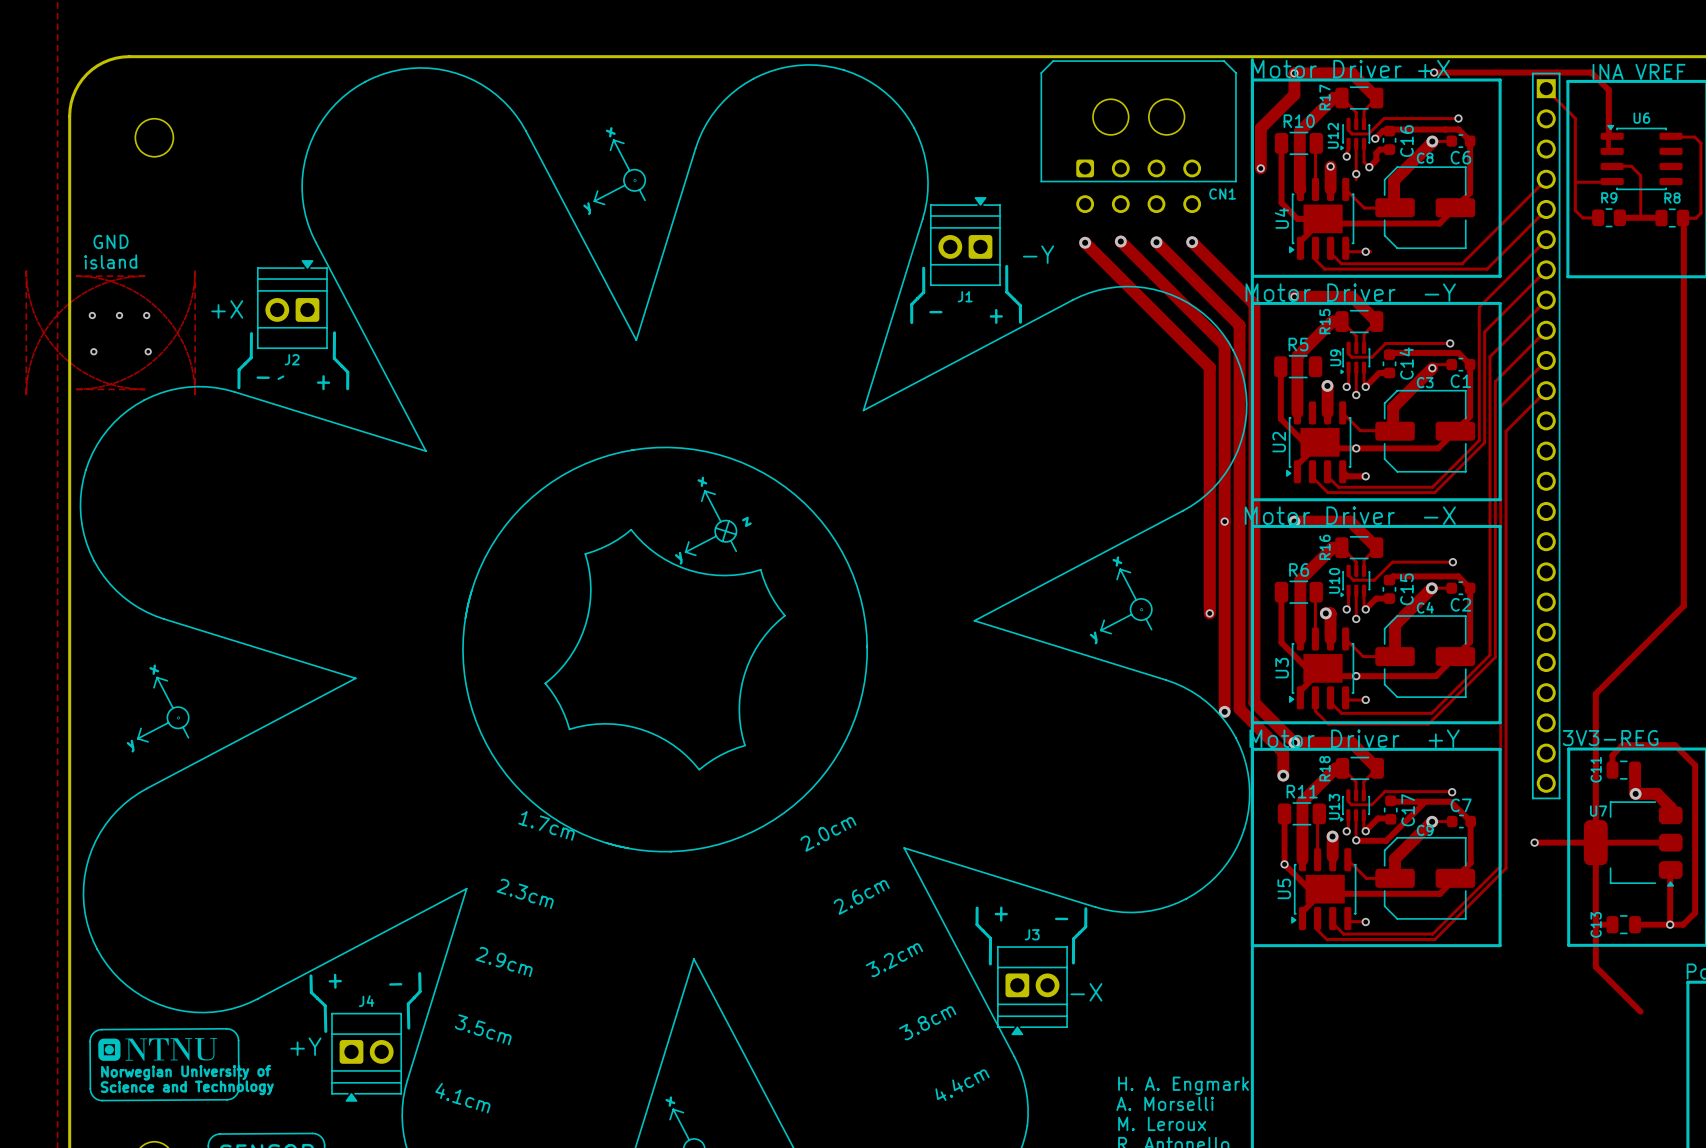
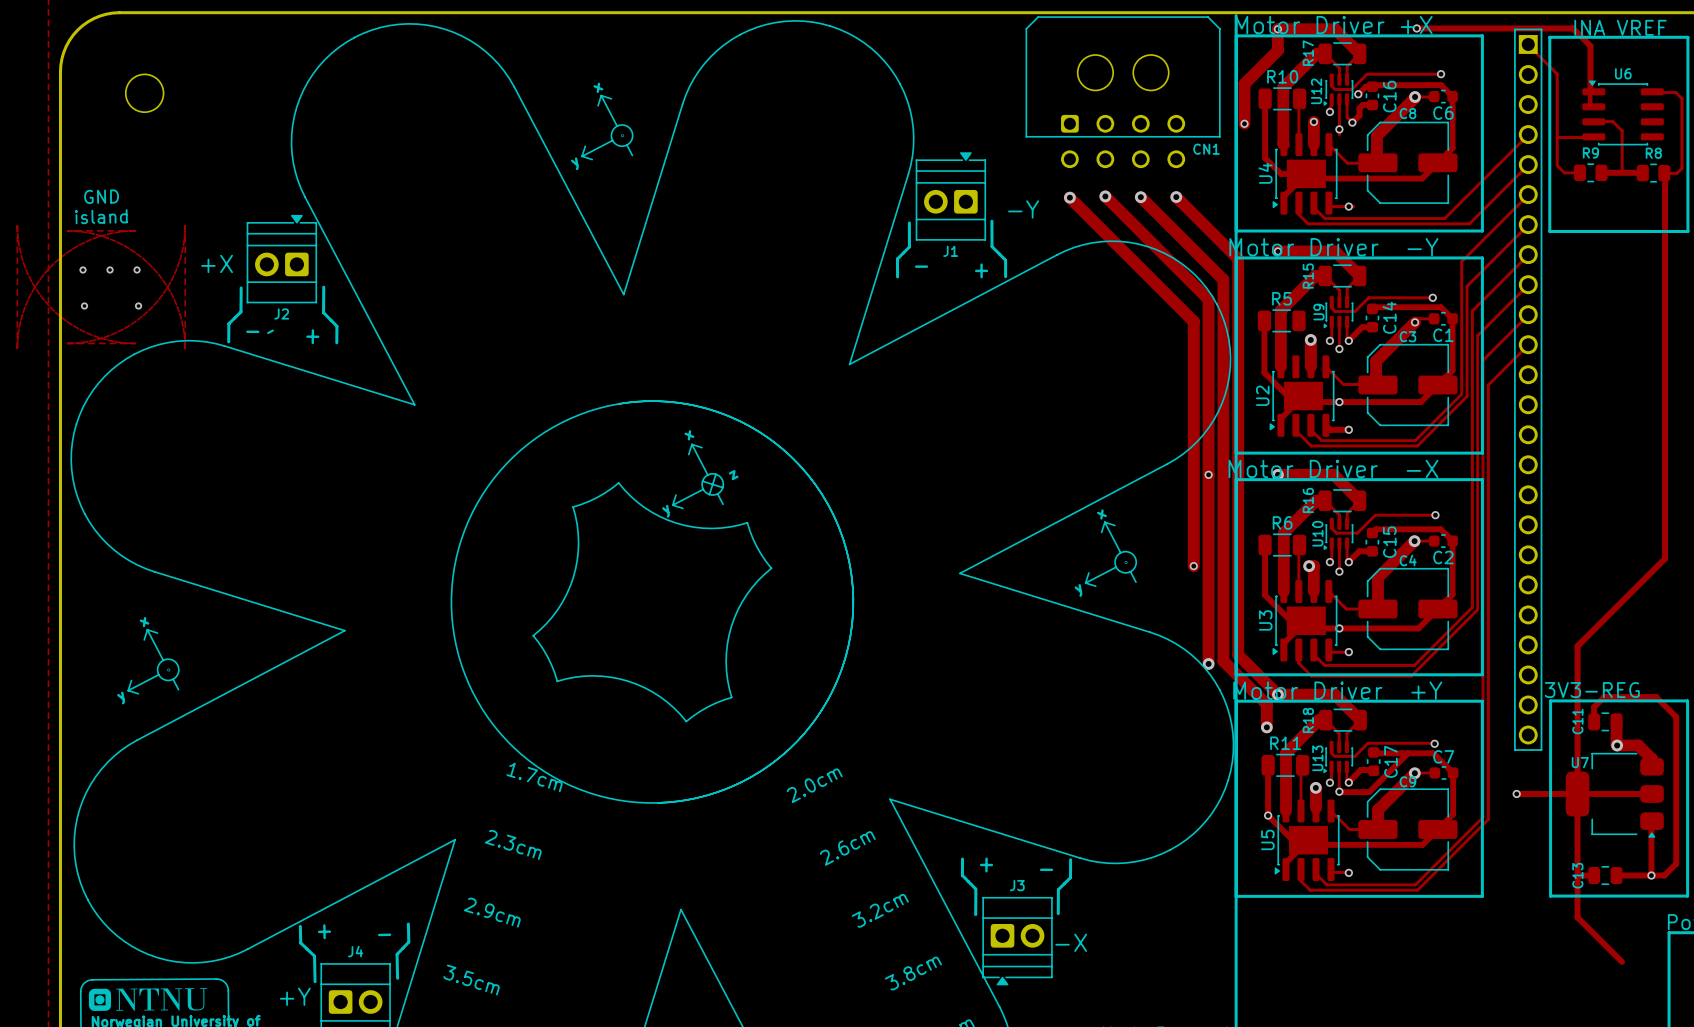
drawing: none -> [451, 400, 854, 804]
line: (633, 449) (609, 455) (573, 469) (541, 489) (522, 506) (505, 525) (484, 558) (470, 593) (465, 618) -> none
line: (471, 590) (463, 638) (464, 674) (476, 722) (492, 754) (514, 784) (550, 816) (582, 833) (628, 848) -> none
line: (606, 842) (638, 849) (671, 851) -> none

